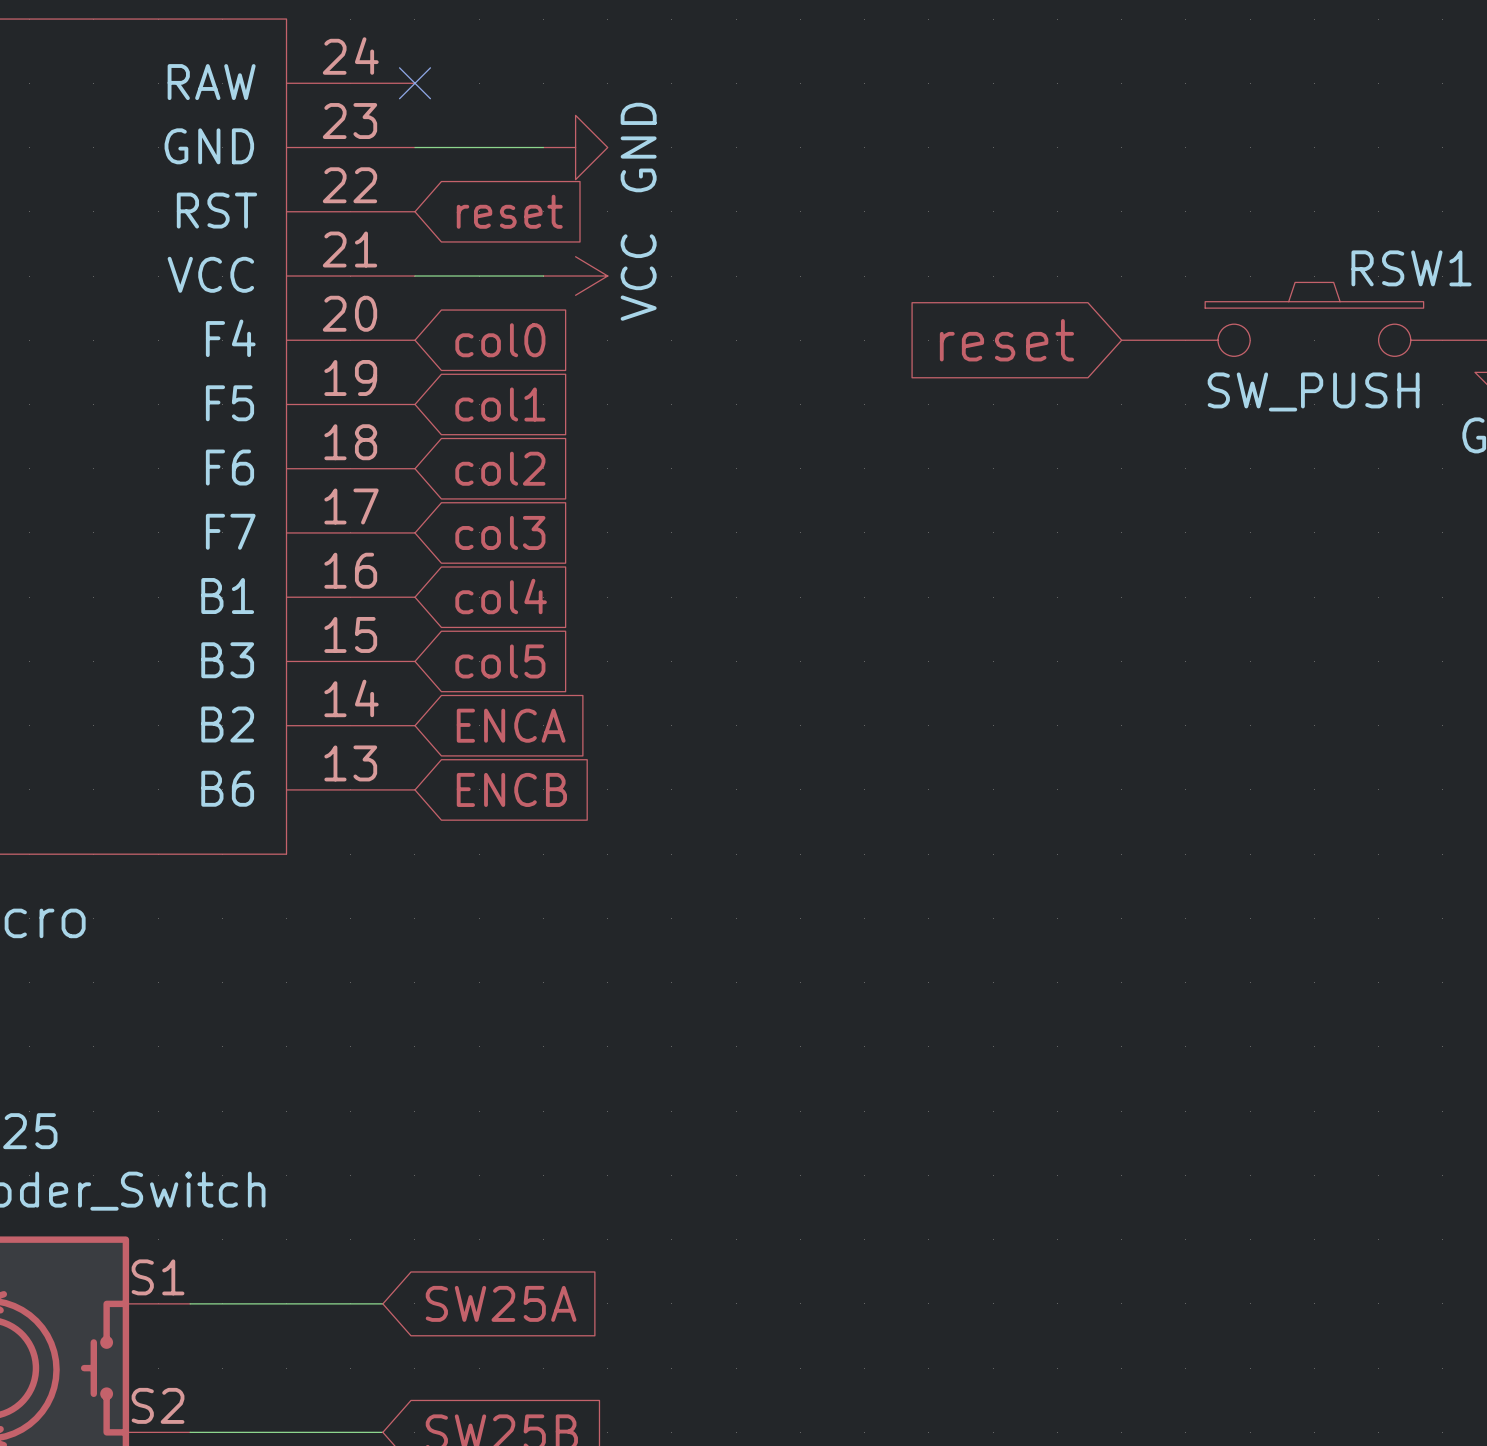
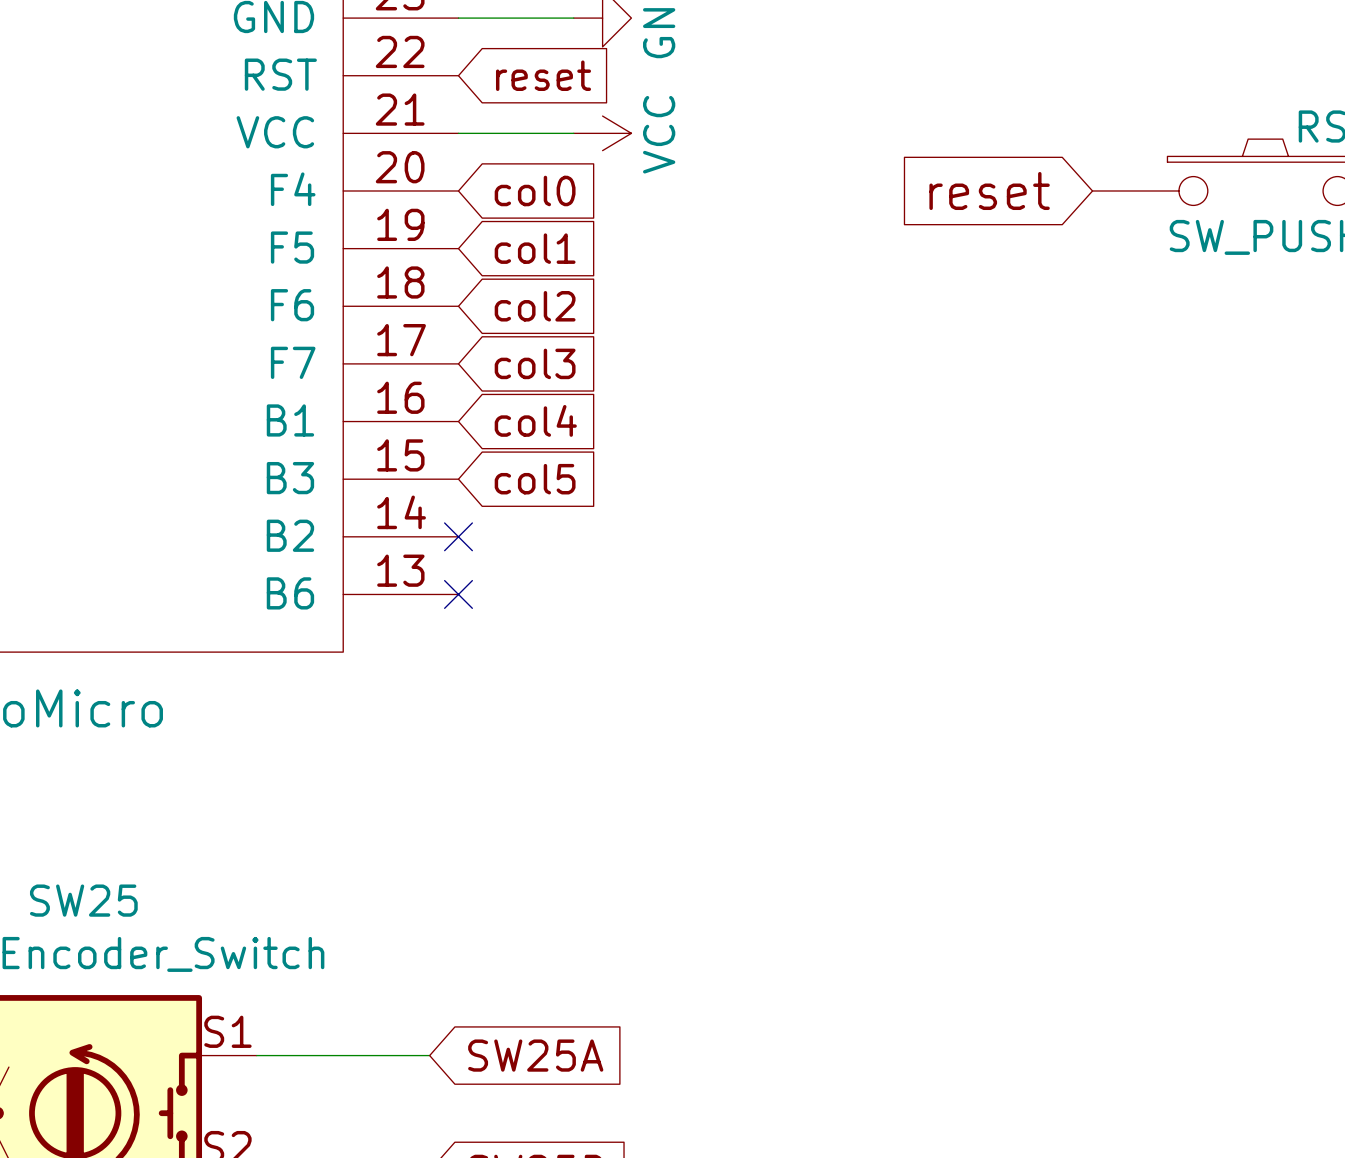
no-connect mark: none -> (458, 536)
global label: ENCA (511, 725) -> none
no-connect mark: none -> (458, 594)
global label: ENCB (511, 789) -> none

